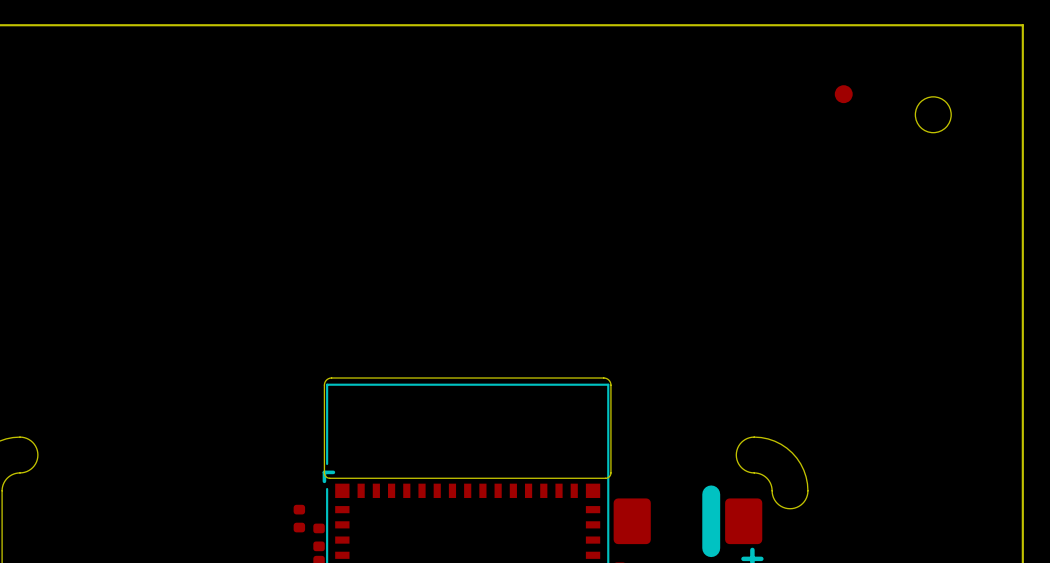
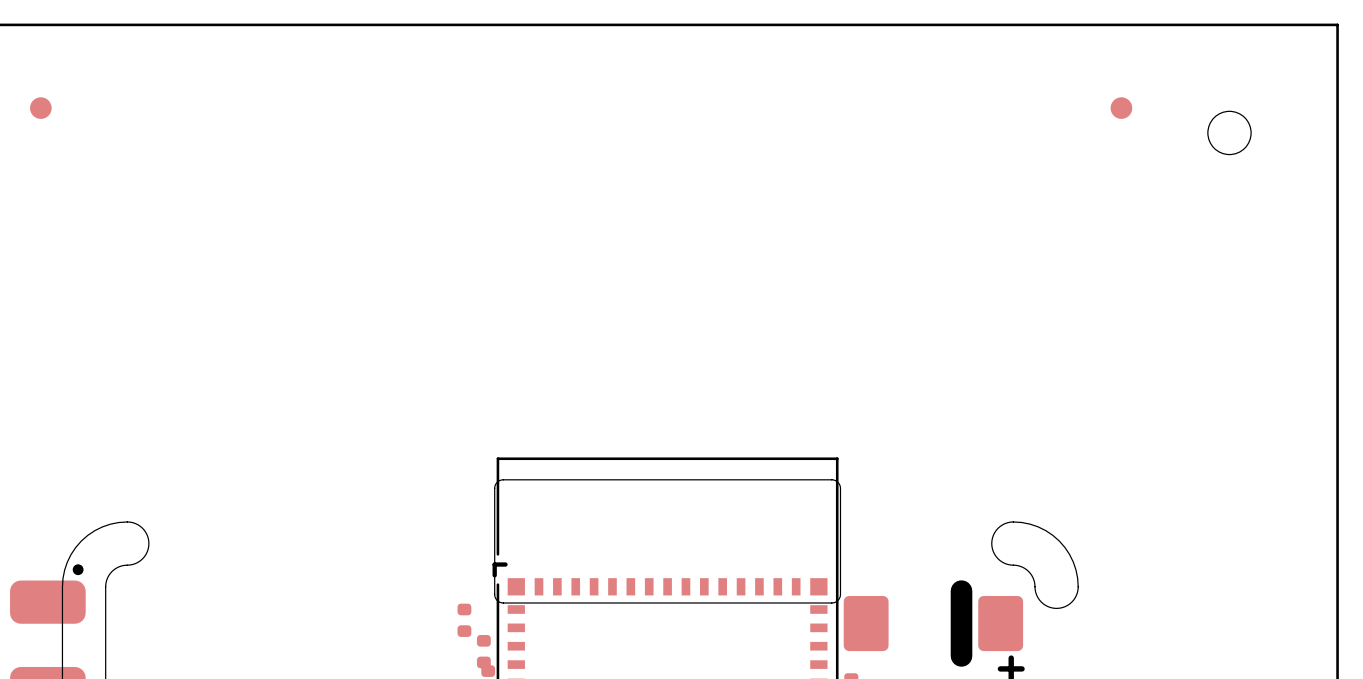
board edge: (324, 409) (324, 383) (327, 379) (331, 378) (604, 378) (610, 383) (610, 409) -> (494, 488) (497, 482) (503, 479) (831, 479) (837, 482) (840, 488)
board edge: (324, 472) (326, 476) (329, 478) (605, 478) (609, 476) (610, 472) -> (494, 565) (494, 596) (497, 601) (503, 603) (832, 602) (837, 601) (840, 596) (840, 565)
part footprint: [313, 523, 325, 552] -> [476, 634, 491, 669]

